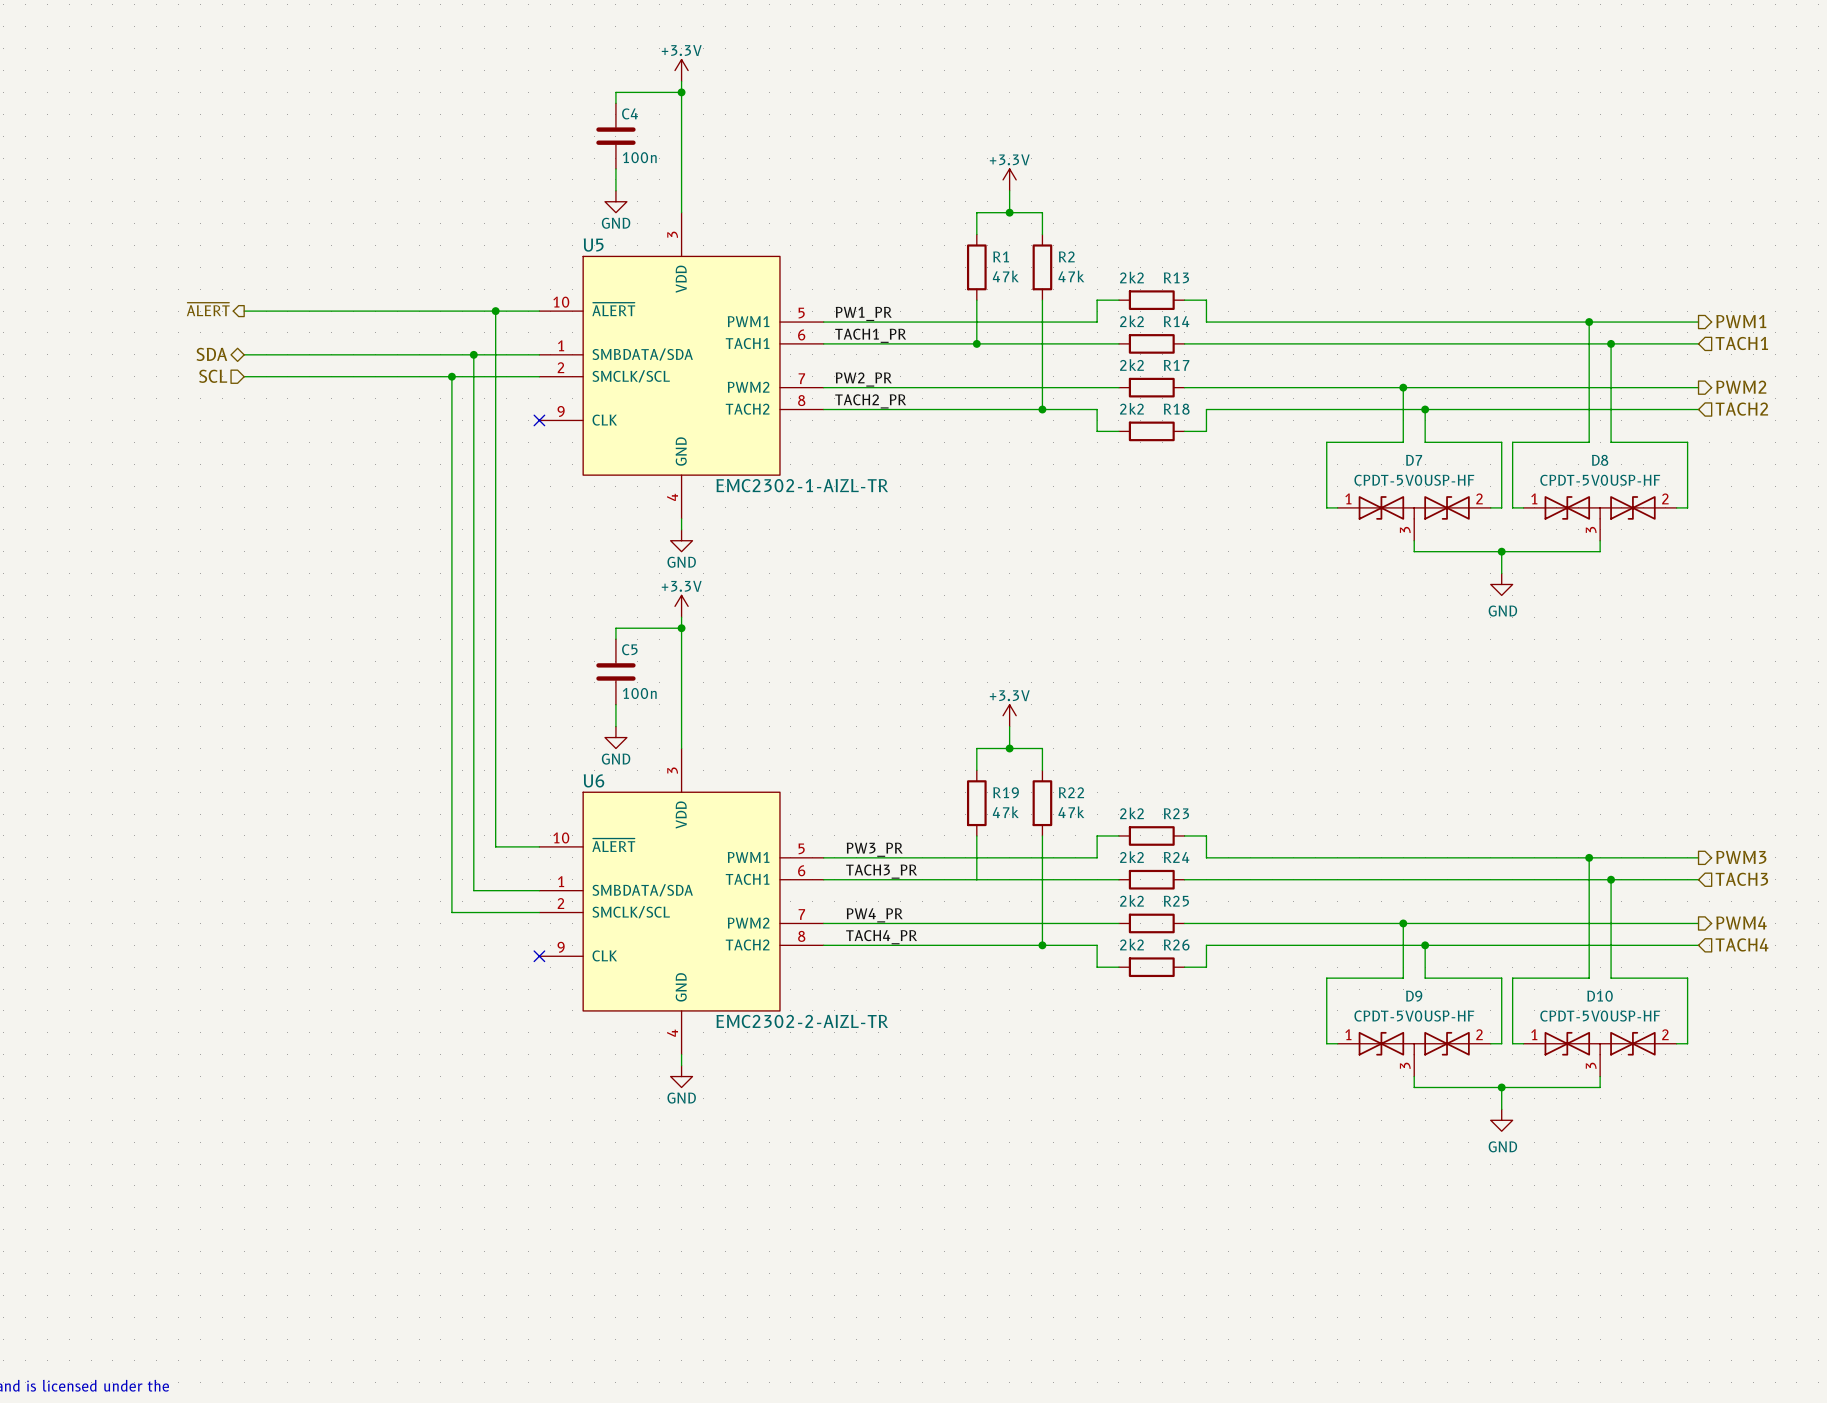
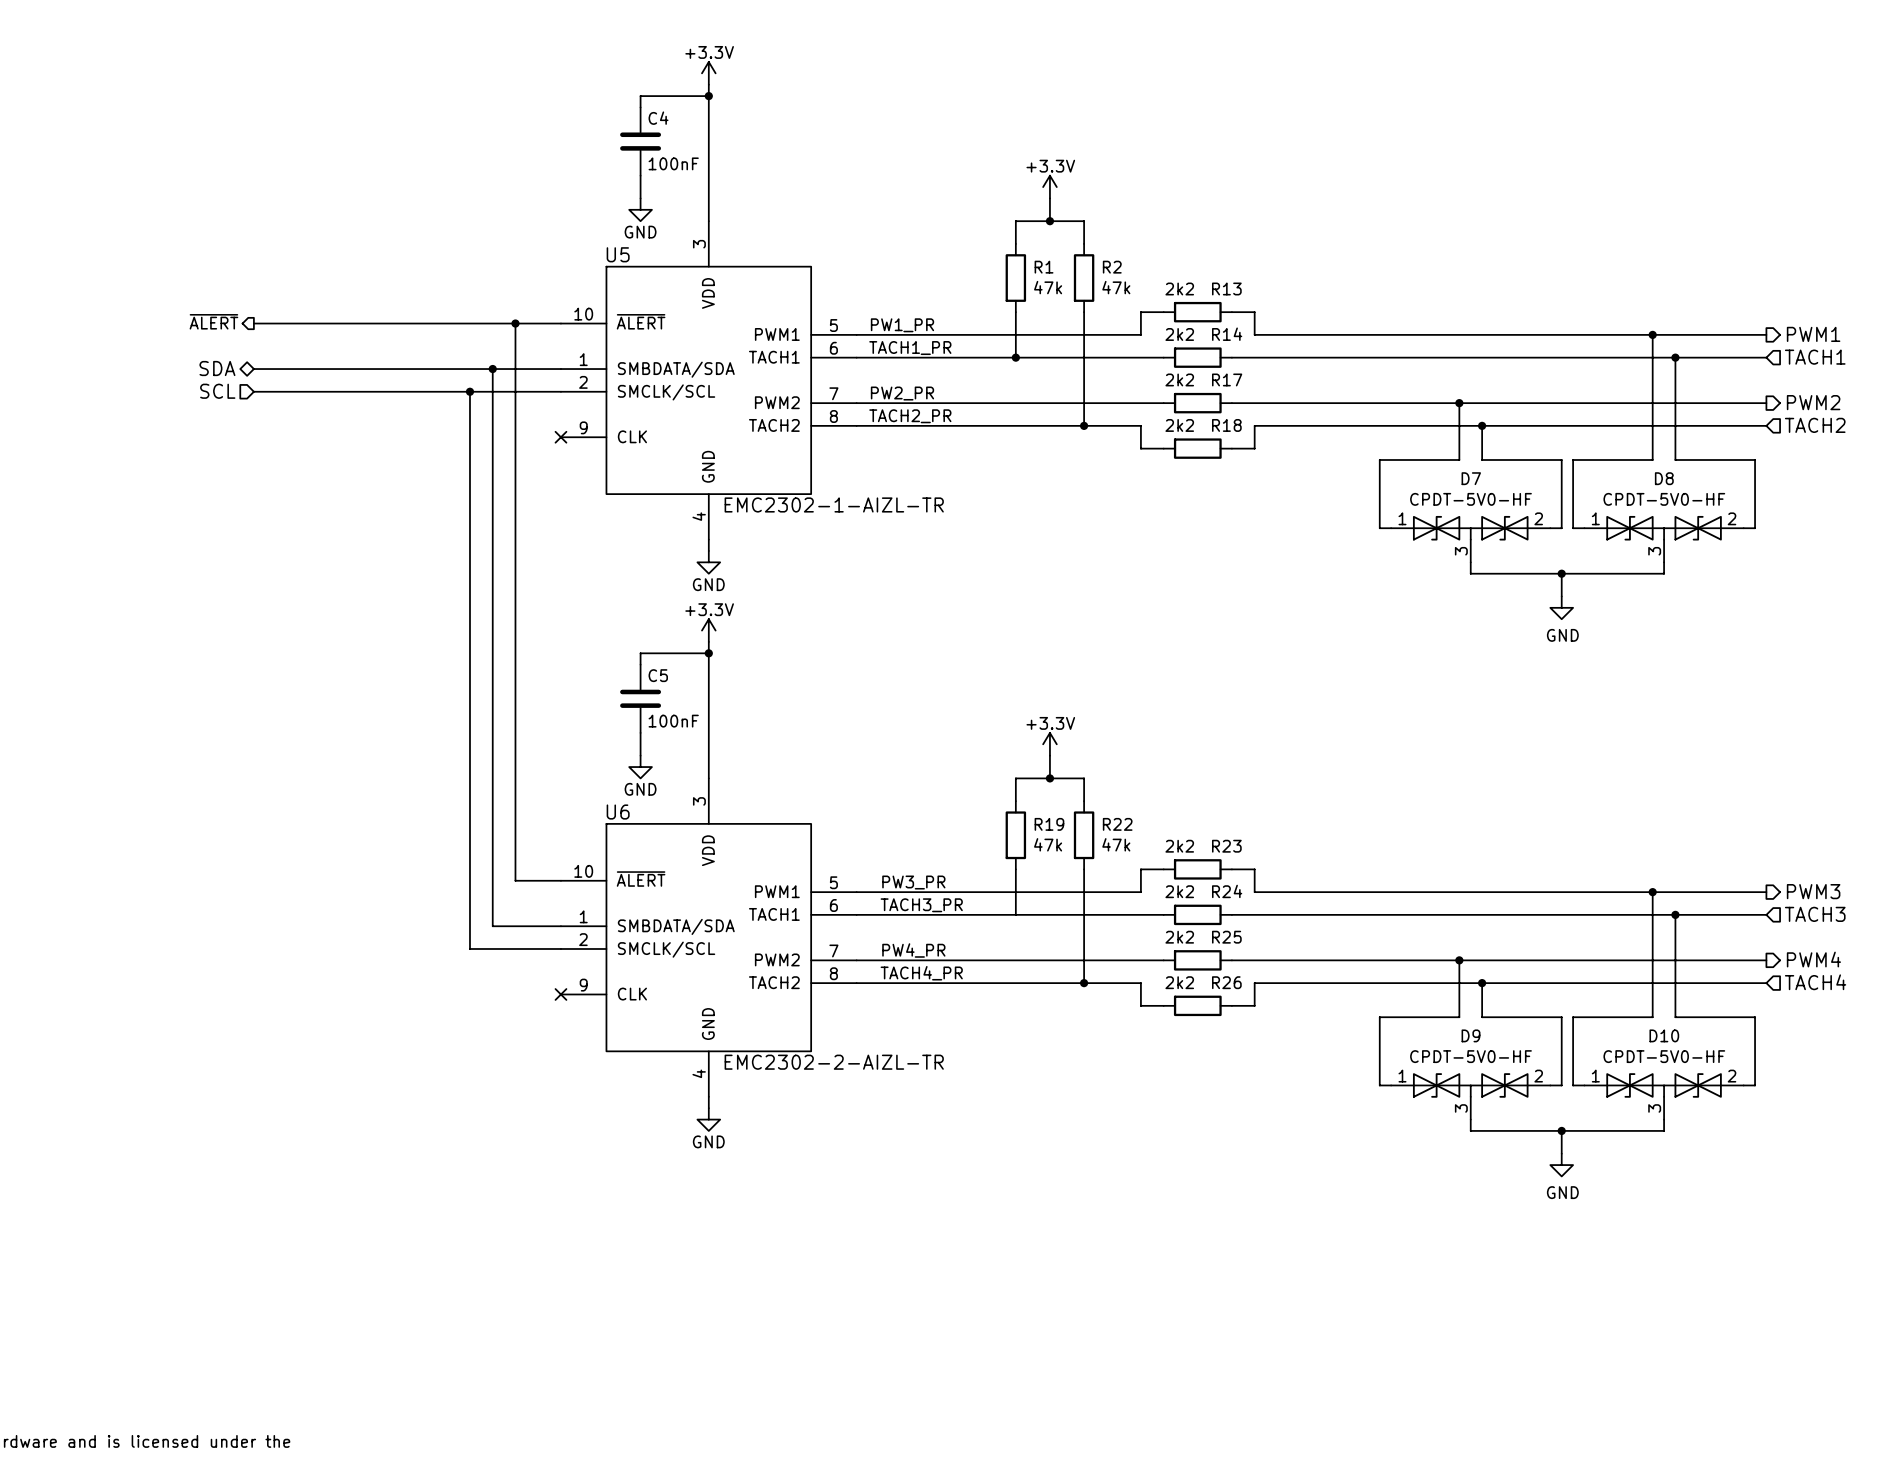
C4 value: 100n (639, 157) -> 100nF (673, 163)
D7 value: CPDT-5V0USP-HF (1414, 480) -> CPDT-5V0-HF (1471, 499)
D8 value: CPDT-5V0USP-HF (1600, 480) -> CPDT-5V0-HF (1664, 499)
C5 value: 100n (639, 693) -> 100nF (673, 721)
D9 value: CPDT-5V0USP-HF (1414, 1016) -> CPDT-5V0-HF (1471, 1056)
D10 value: CPDT-5V0USP-HF (1600, 1016) -> CPDT-5V0-HF (1664, 1056)

